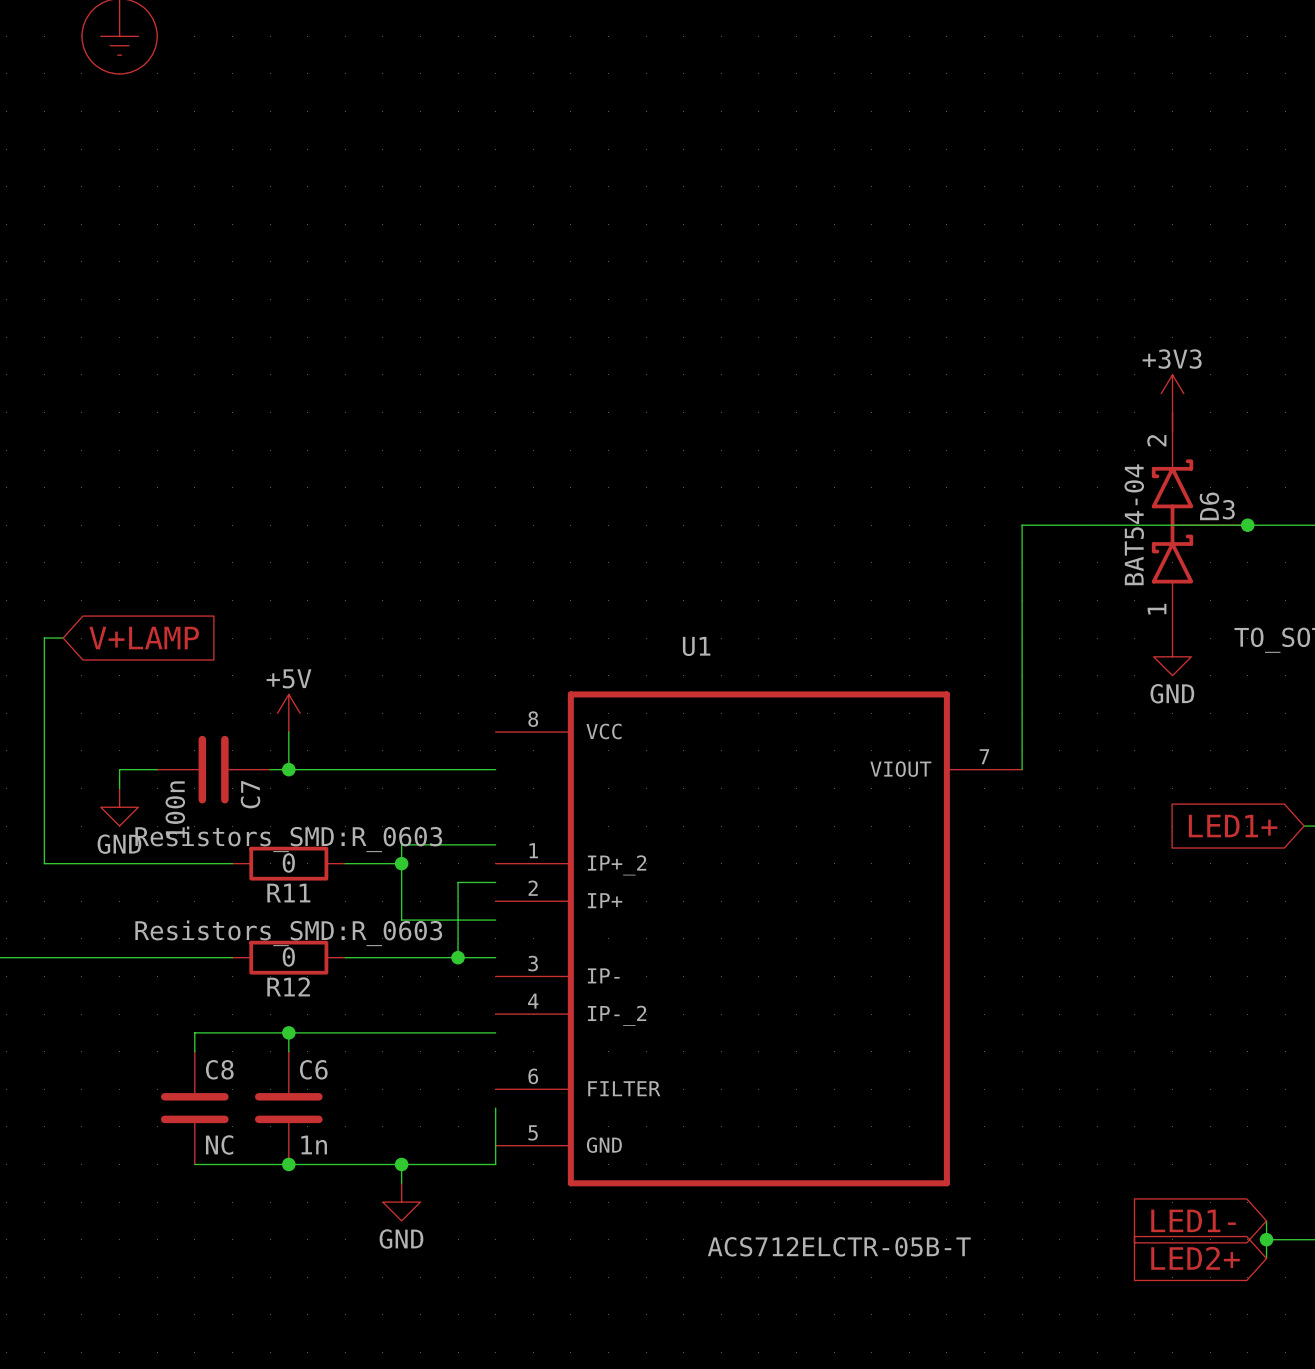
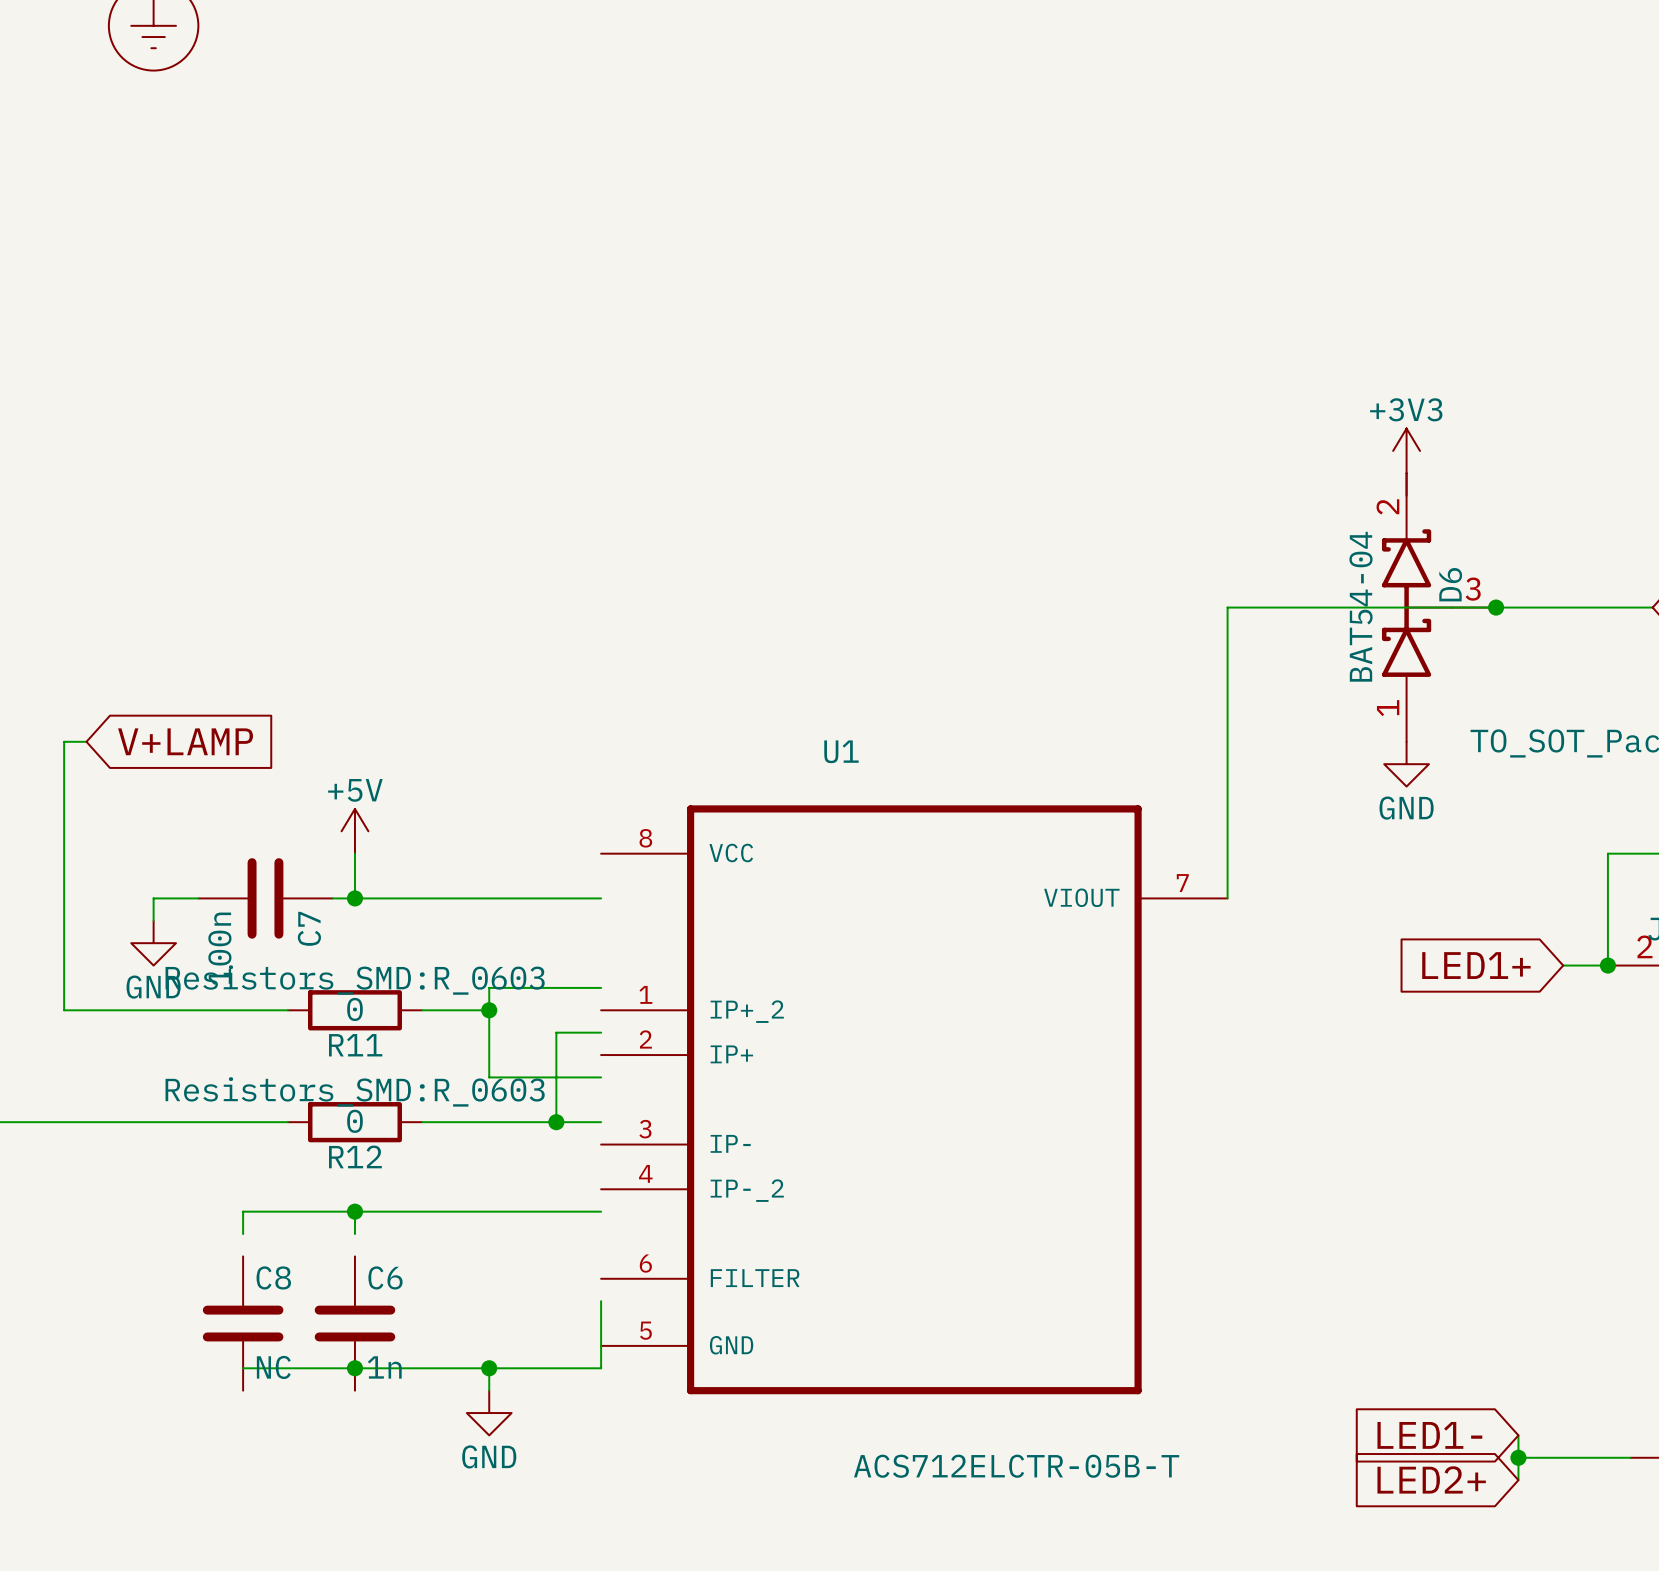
C8 position: (194, 1108) -> (243, 1323)
C6 position: (288, 1108) -> (354, 1323)

